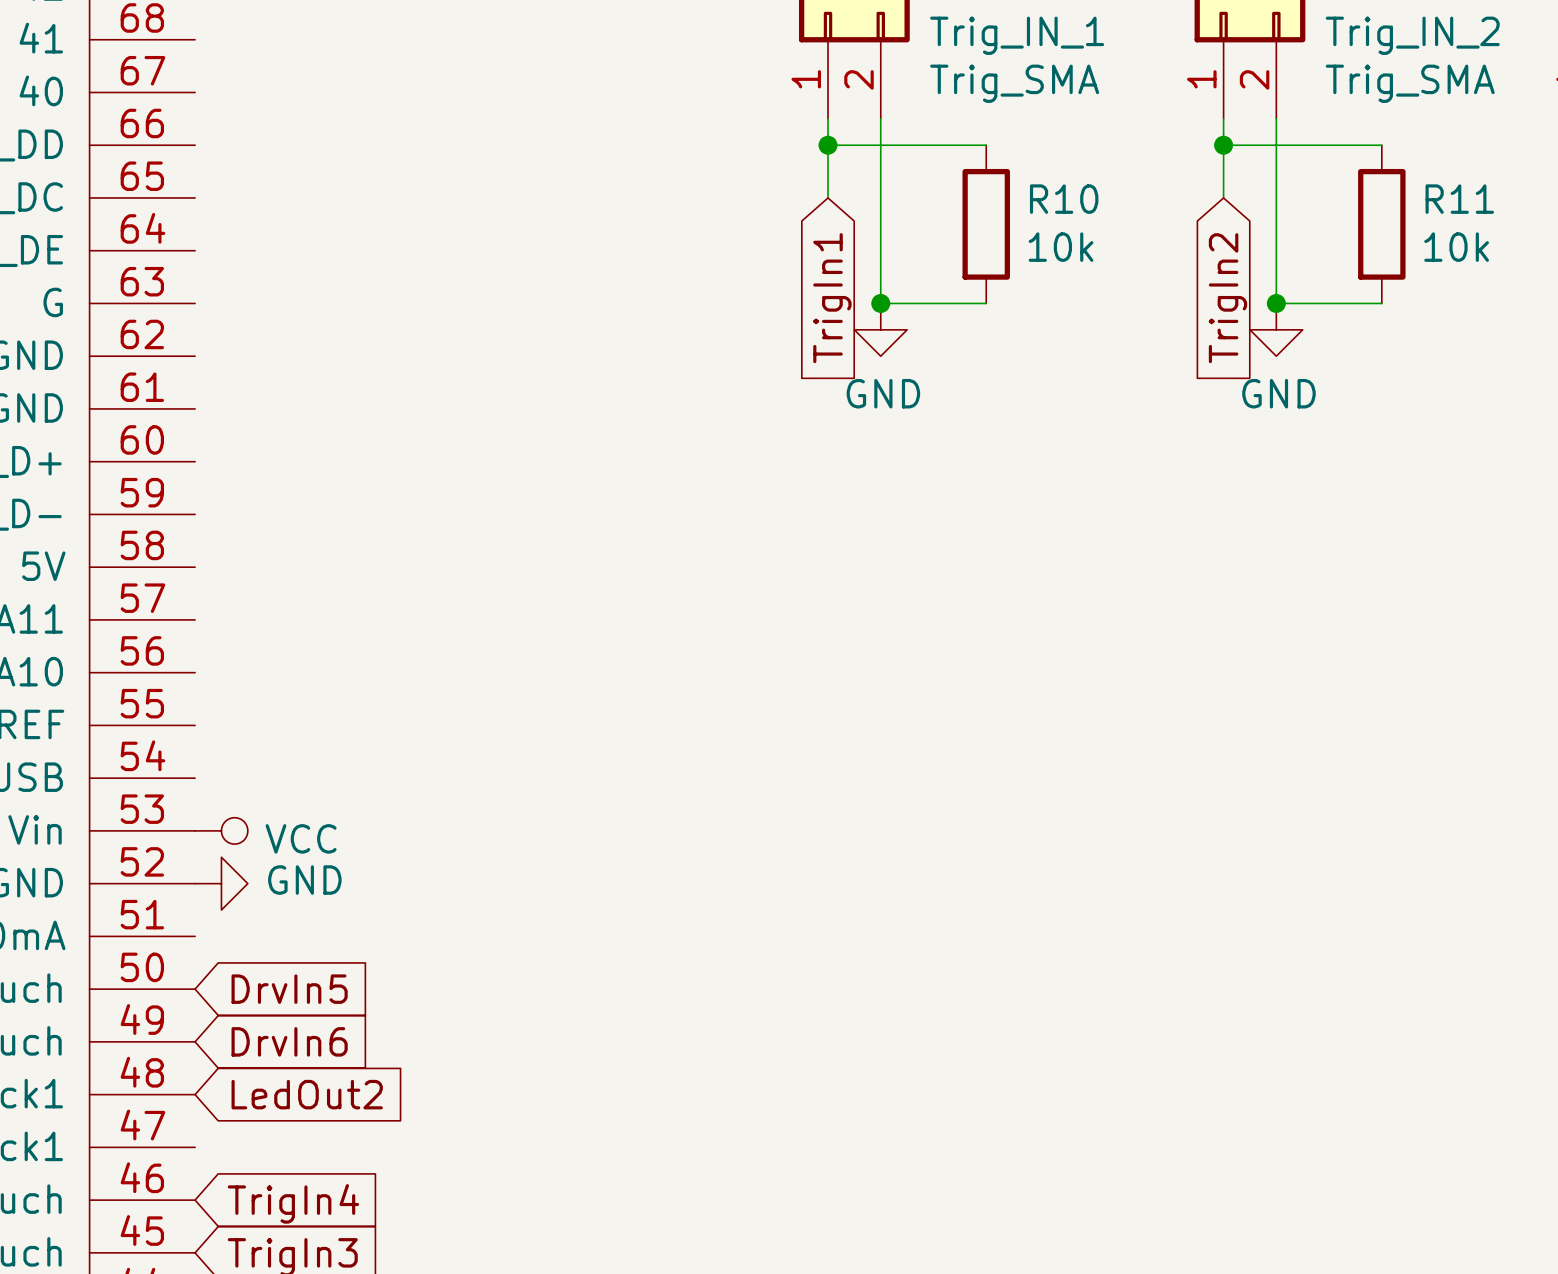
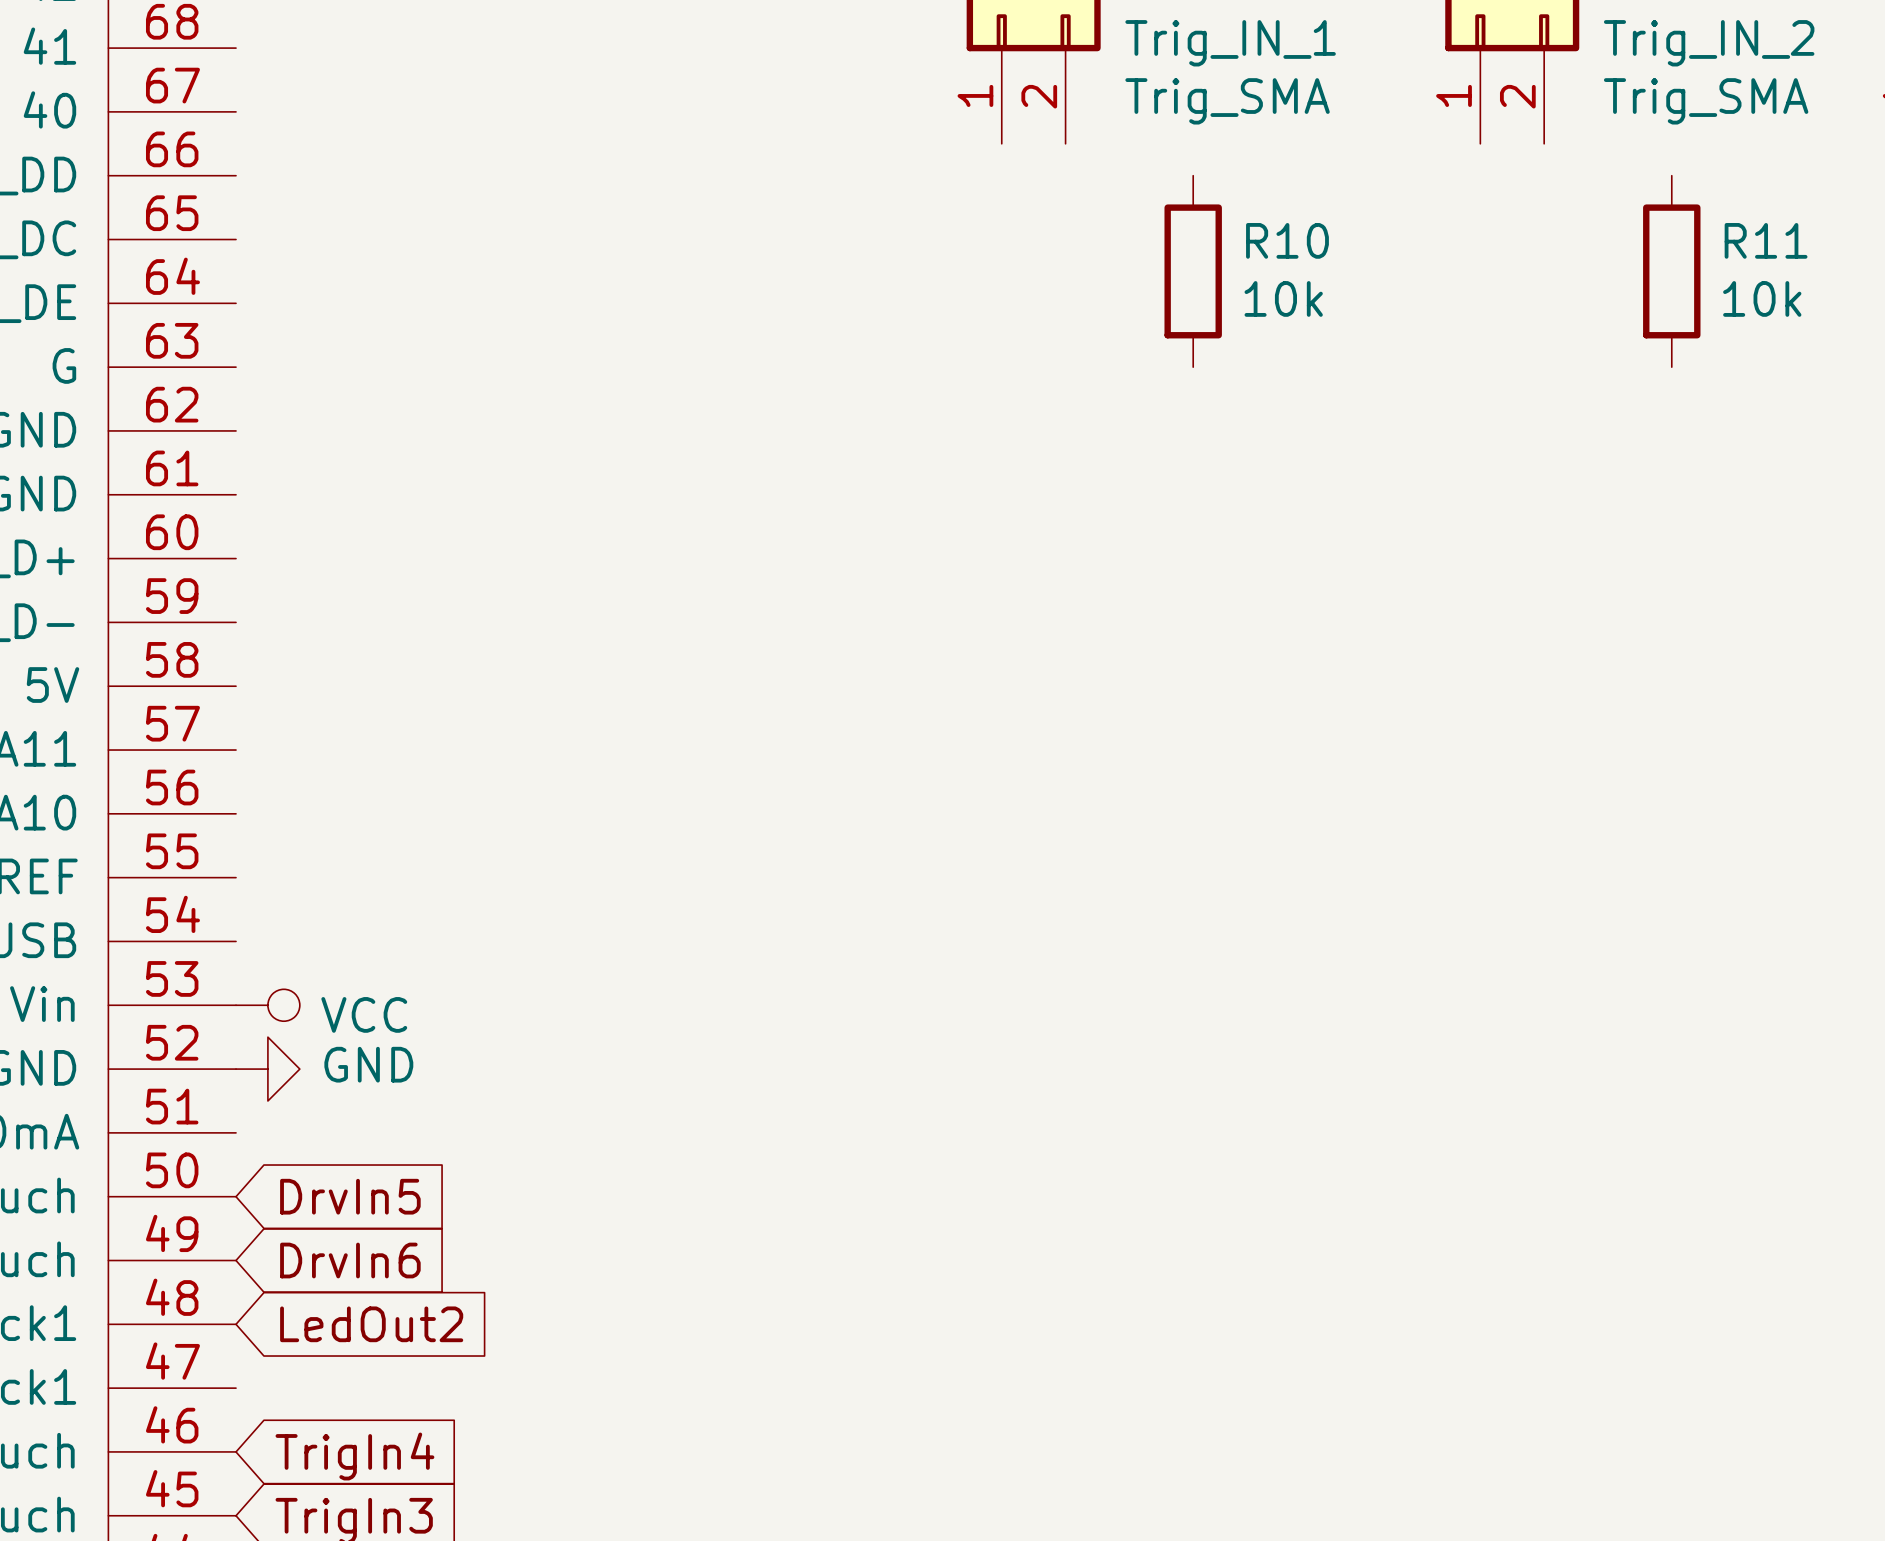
wire: (828, 118) (828, 197) -> none
wire: (880, 118) (880, 303) (986, 303) -> none
wire: (1223, 118) (1223, 197) -> none
wire: (1276, 118) (1276, 303) (1381, 303) -> none
wire: (828, 145) (986, 145) -> none
junction: (828, 145) -> none
wire: (1223, 145) (1381, 145) -> none
junction: (1223, 145) -> none
global label: TrigIn1 (832, 298) -> none
global label: TrigIn2 (1227, 298) -> none
junction: (880, 303) -> none
junction: (1276, 303) -> none
power symbol: GND (880, 329) -> none
power symbol: GND (1276, 329) -> none

